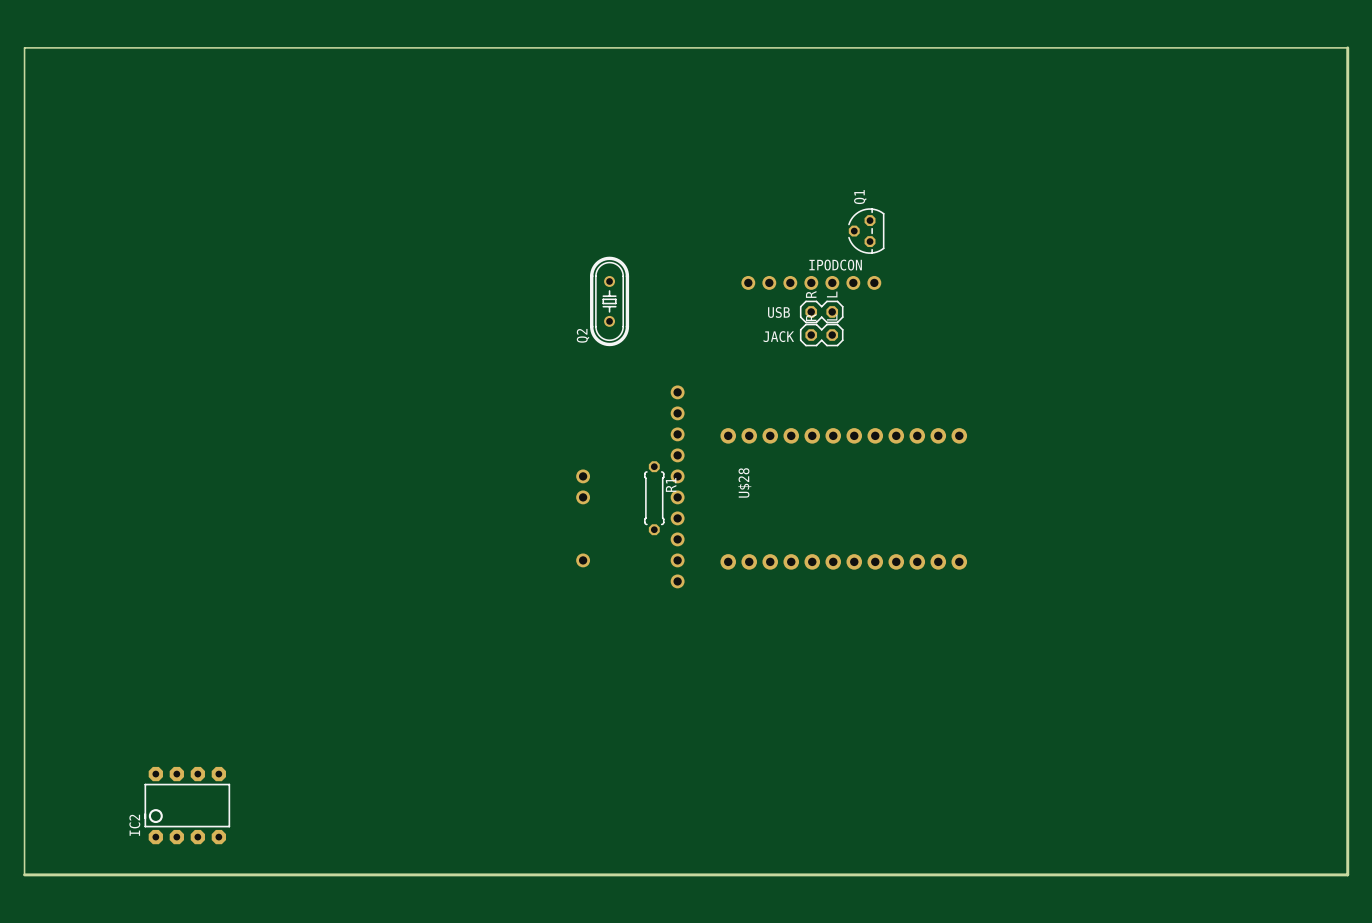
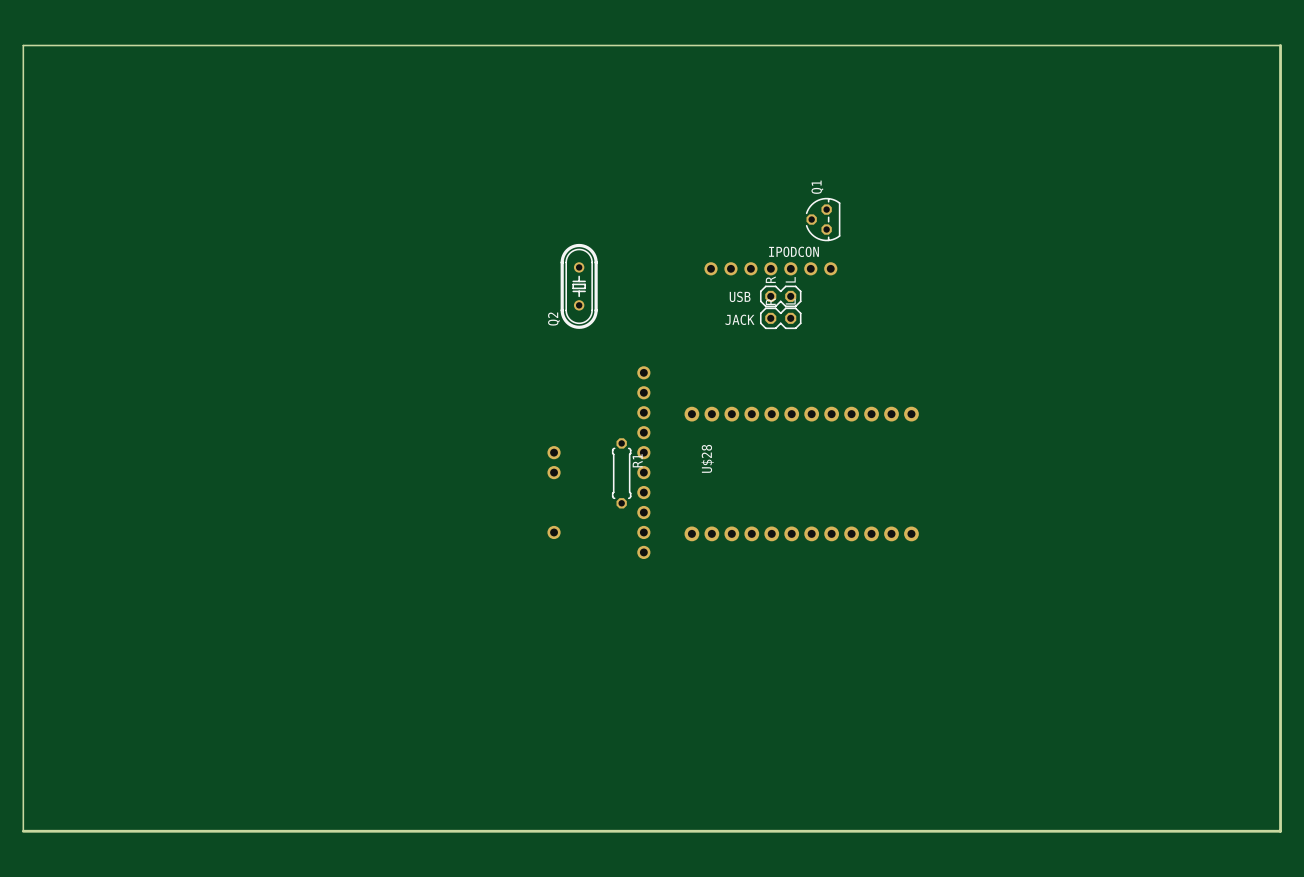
IC2: (187, 805) -> none

